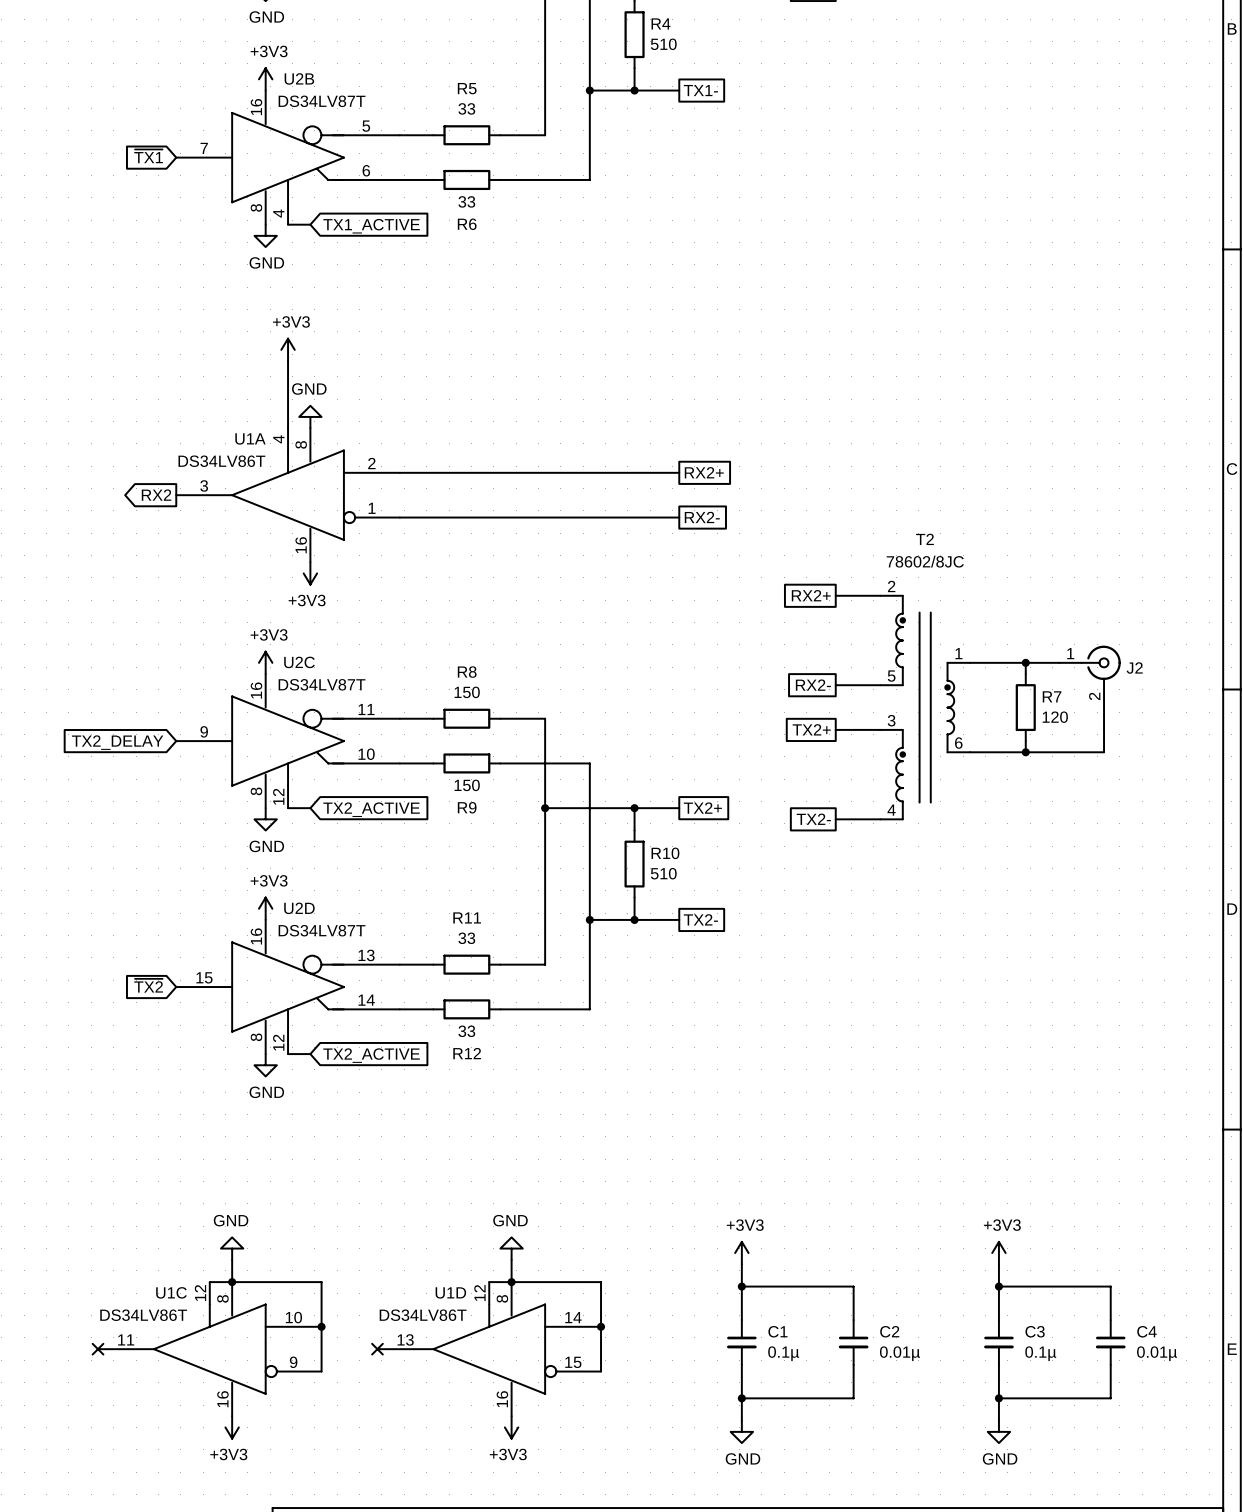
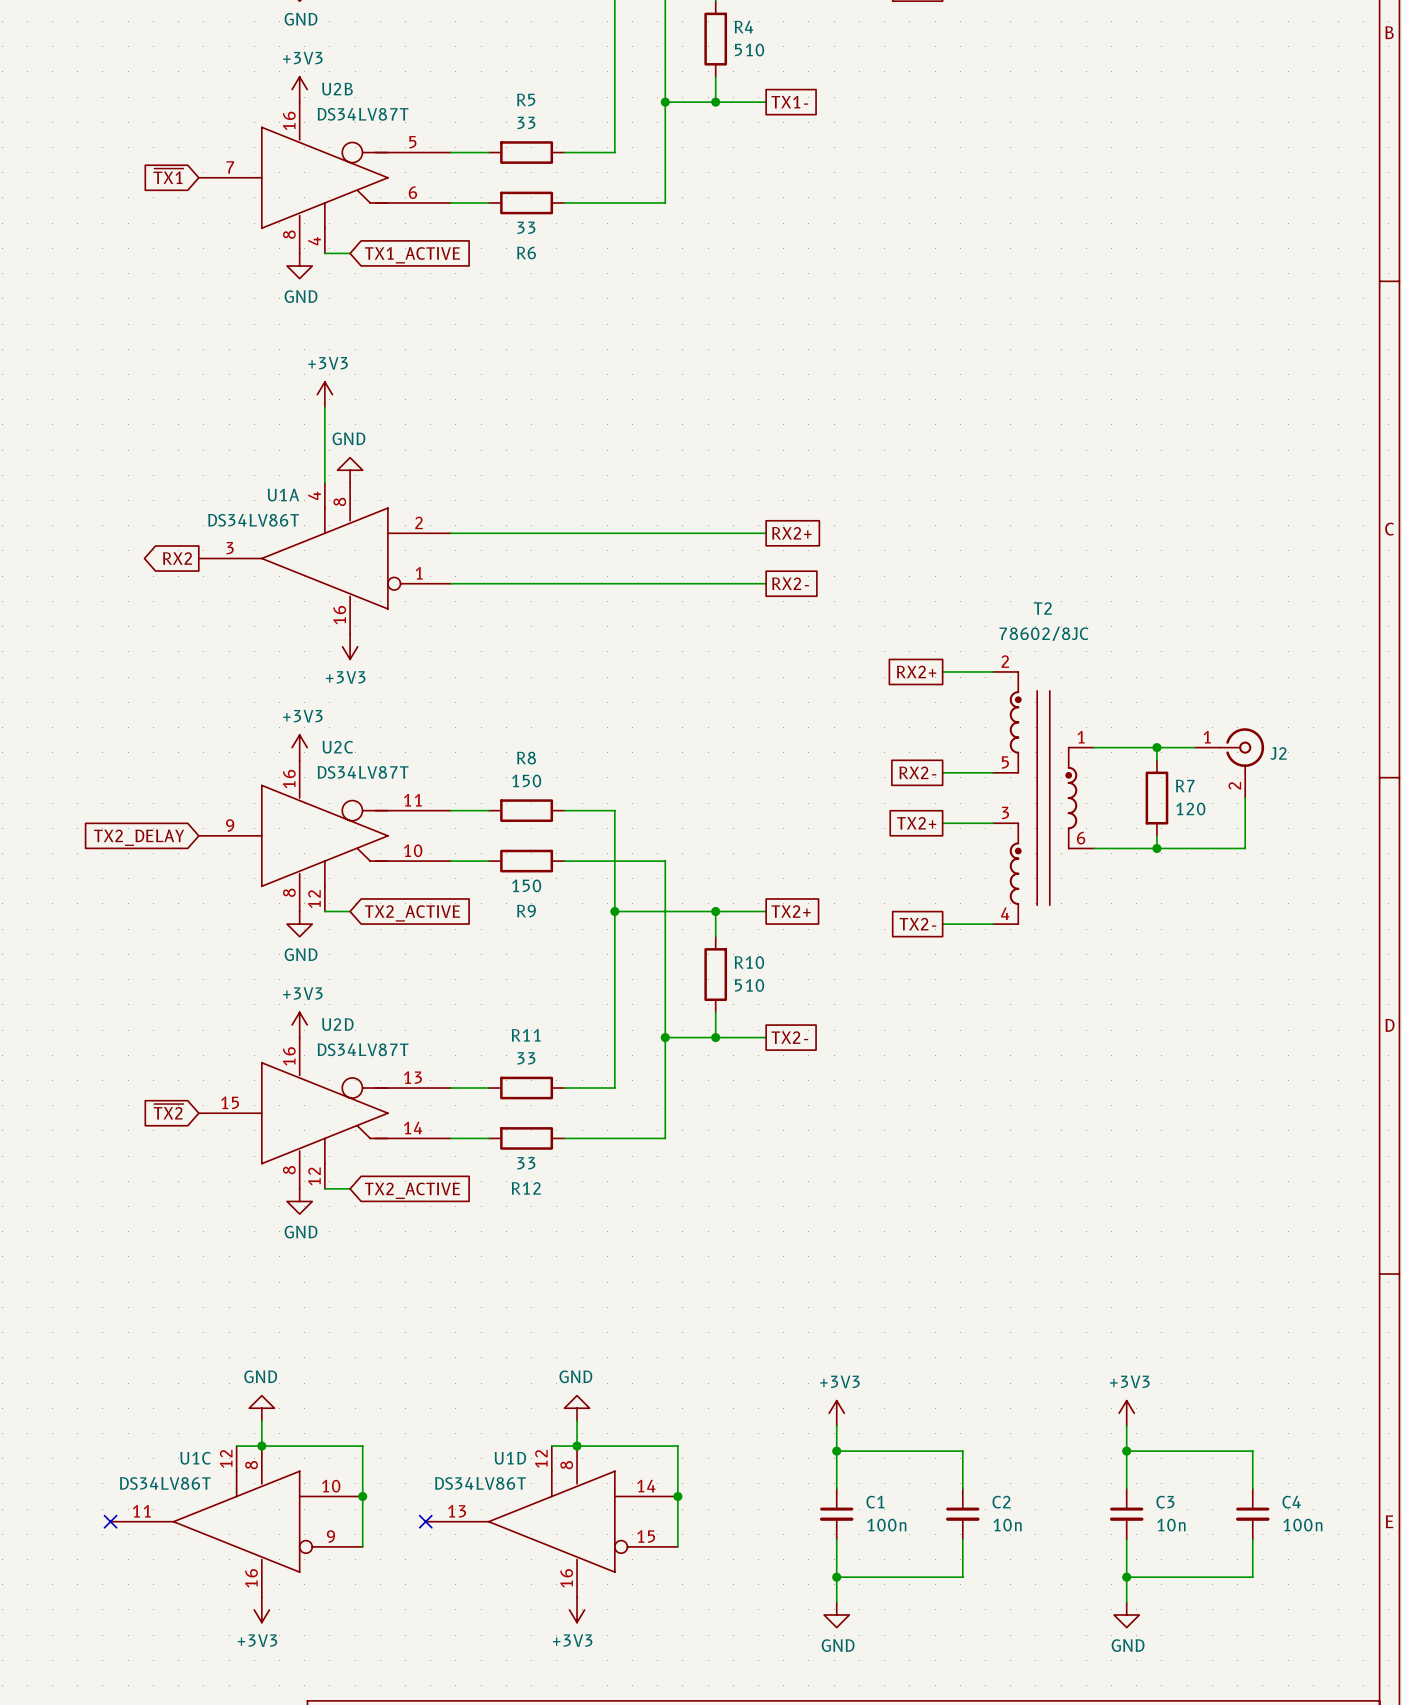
C1 value: 0.1µ (783, 1353) -> 100n (886, 1525)
C2 value: 0.01µ (899, 1353) -> 10n (1007, 1525)
C3 value: 0.1µ (1040, 1353) -> 10n (1171, 1525)
C4 value: 0.01µ (1157, 1353) -> 100n (1302, 1525)

